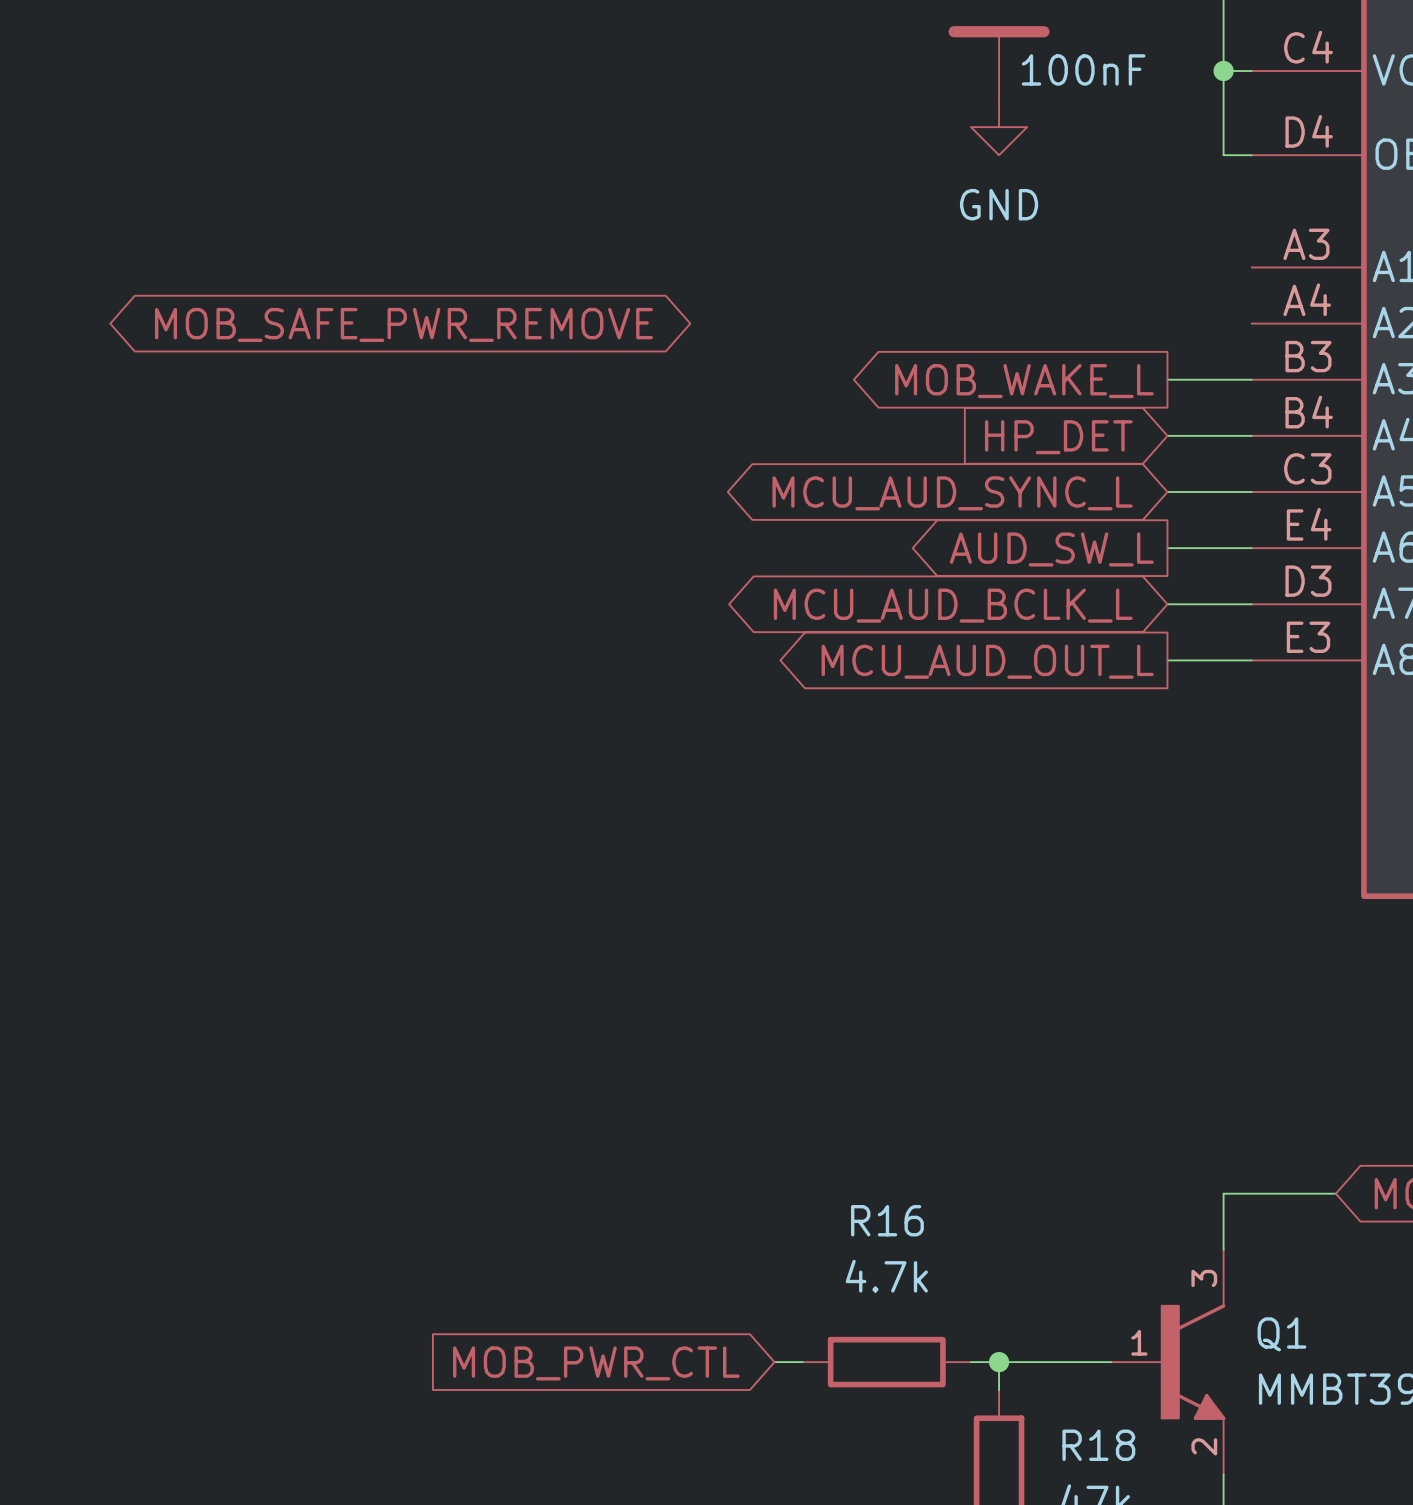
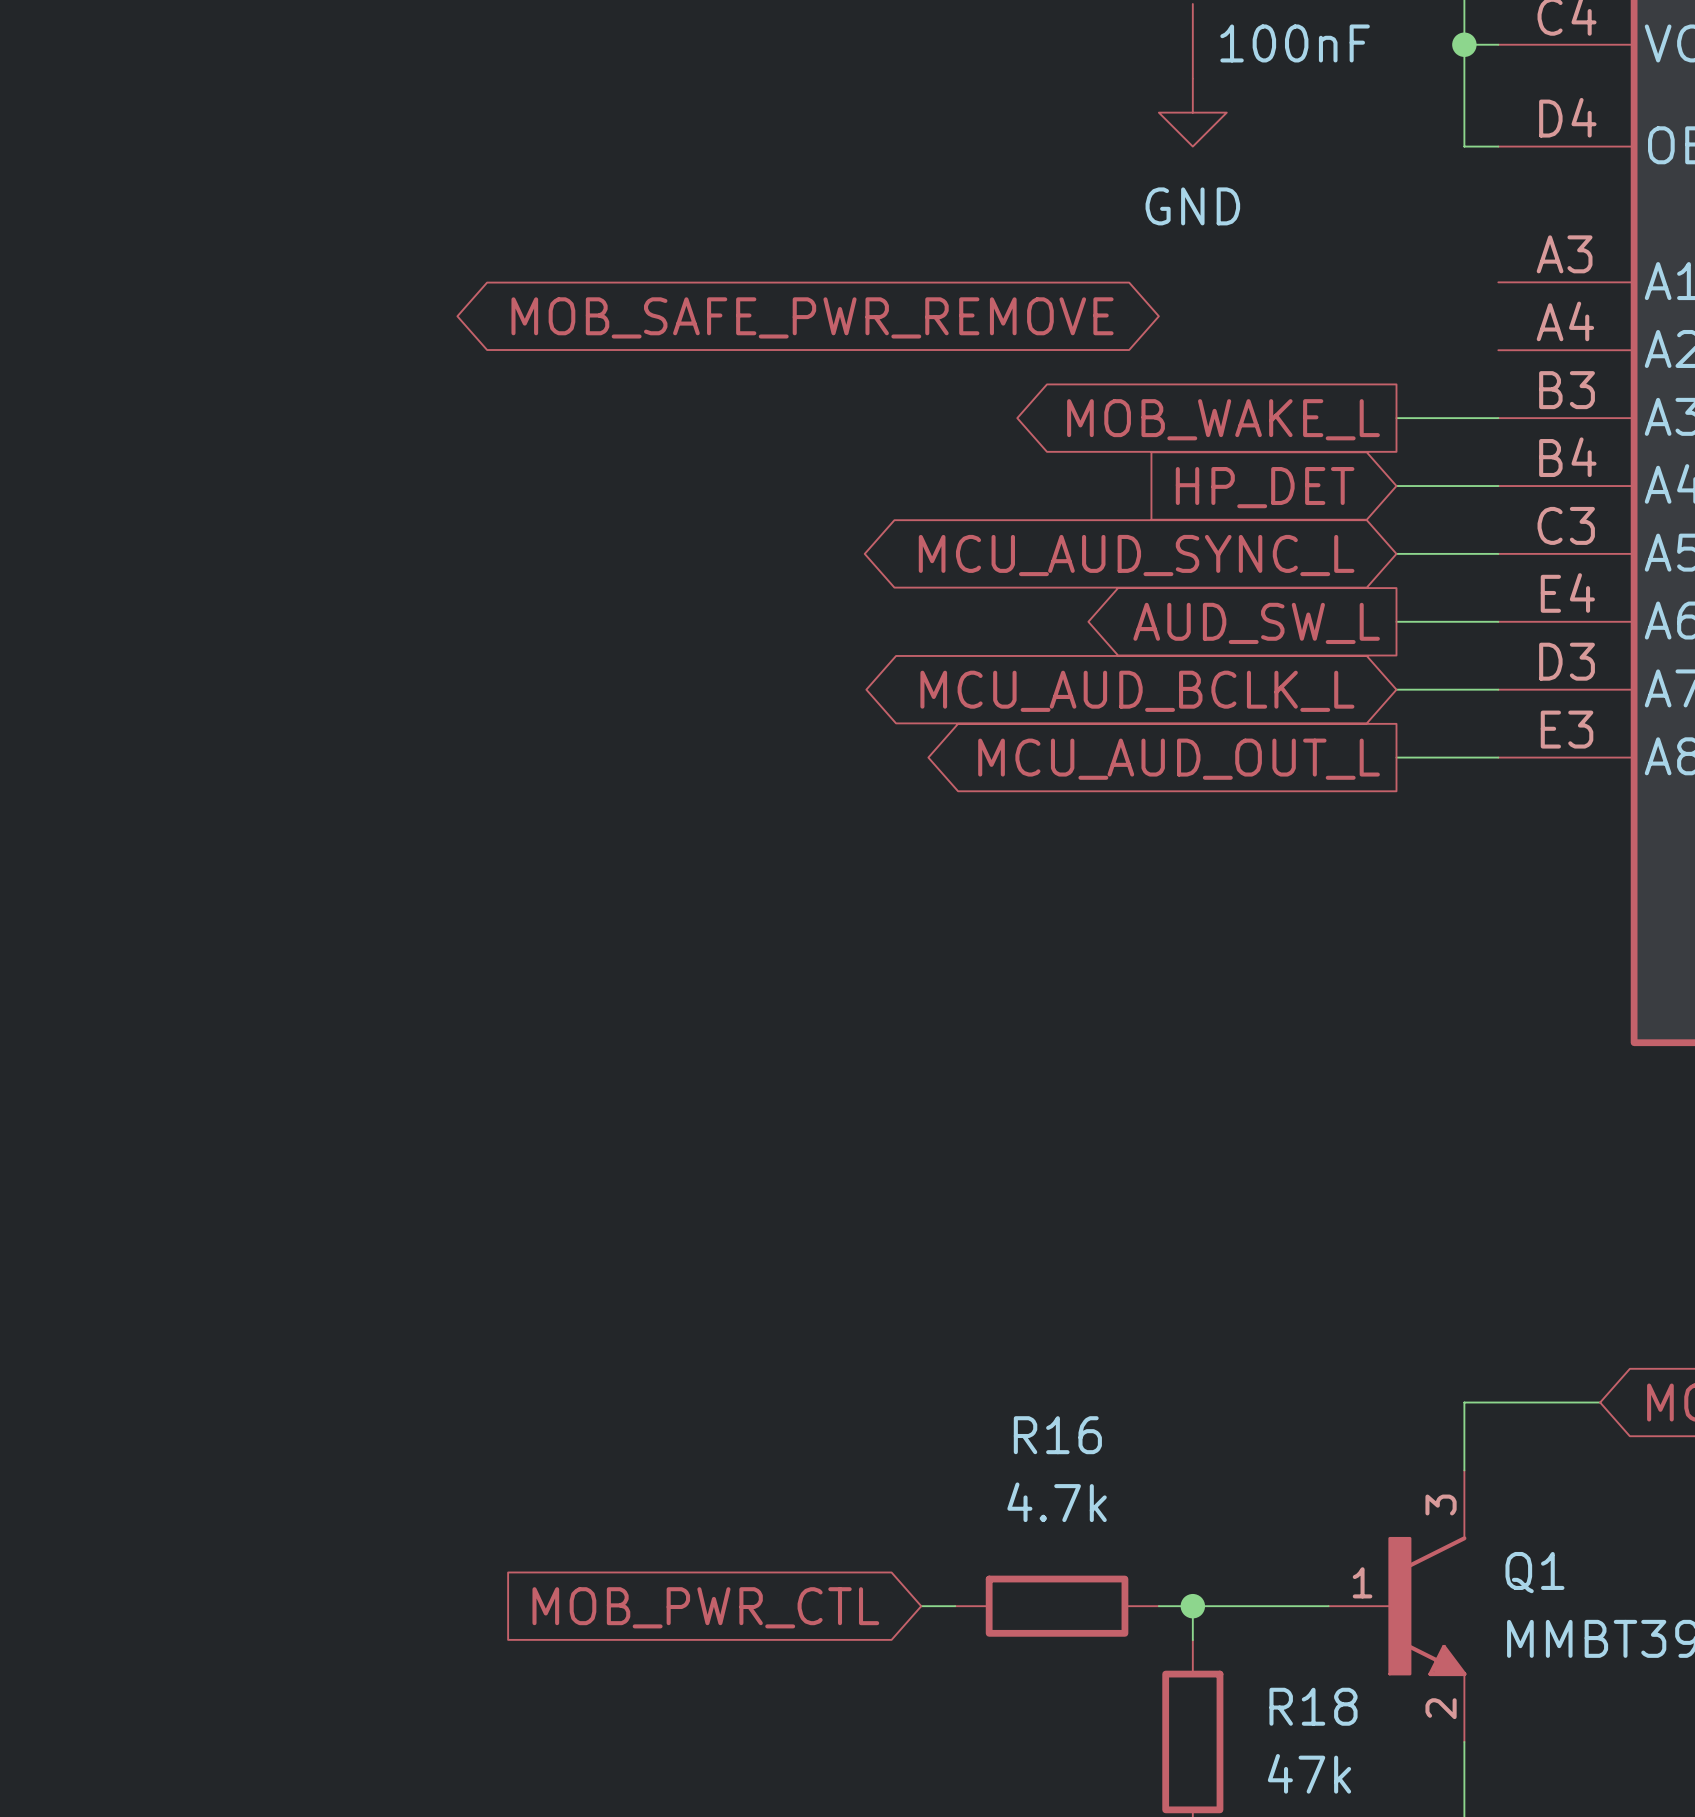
global label position: MOB_SAFE_PWR_REMOVE (403, 324) -> MOB_SAFE_PWR_REMOVE (812, 317)

